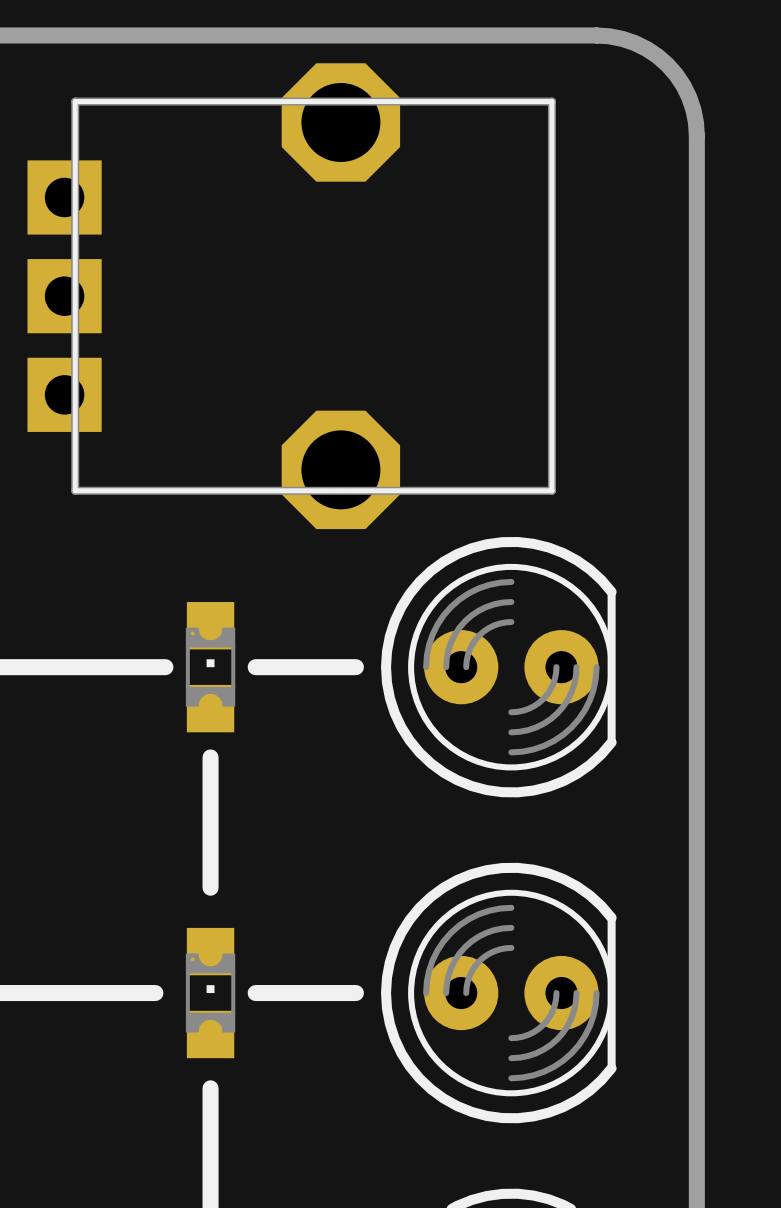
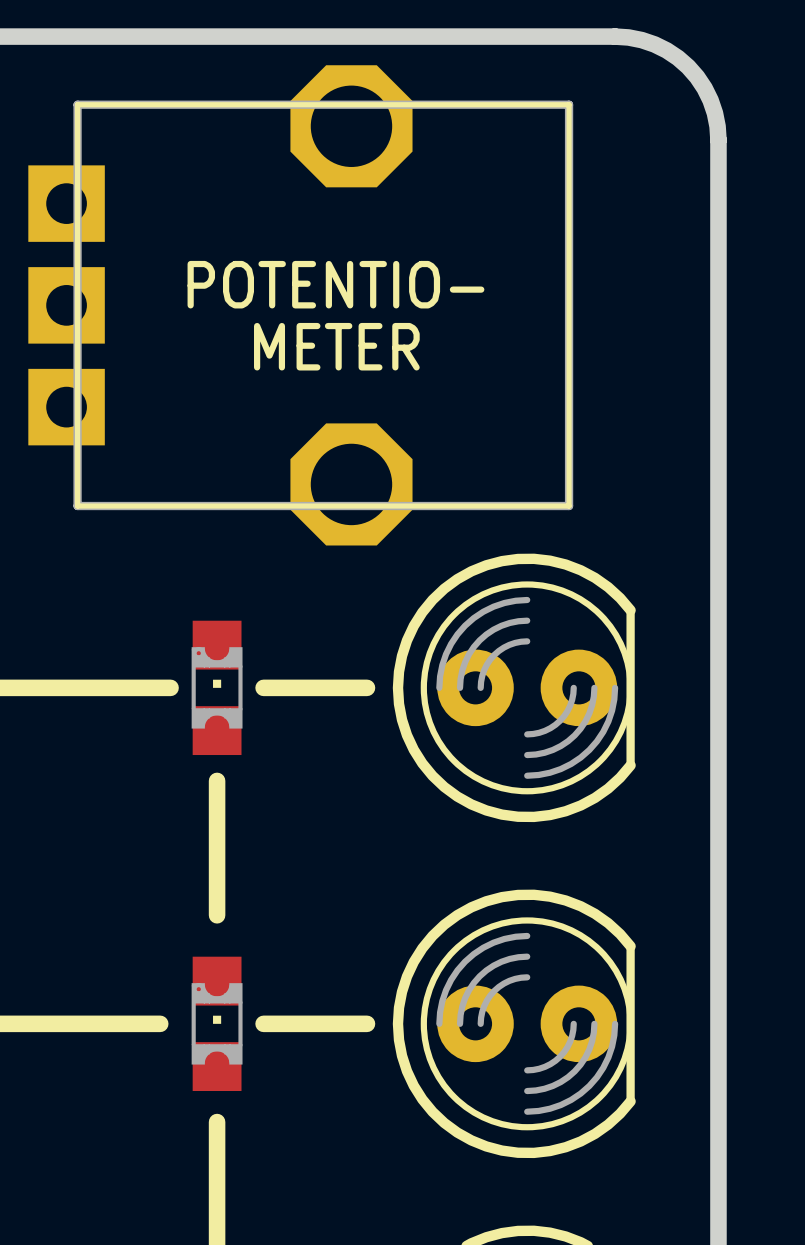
text: none -> POTENTIO- (335, 284)
text: none -> METER (336, 346)

